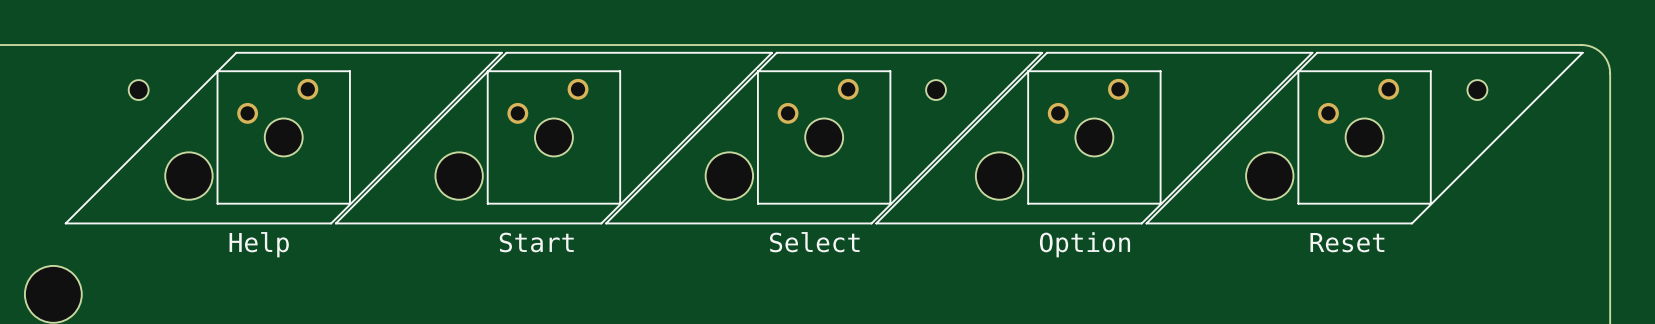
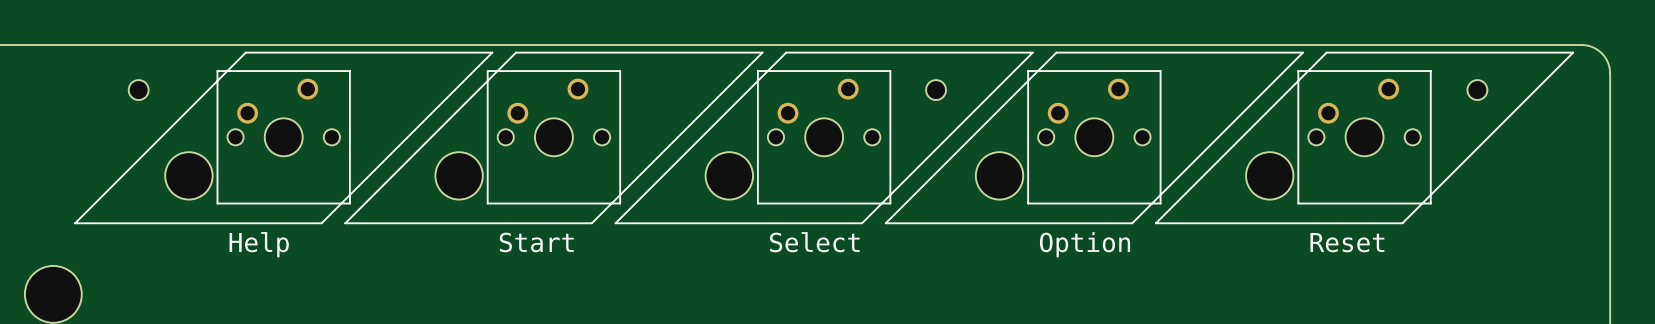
part footprint: [64, 52, 503, 225] -> [74, 51, 494, 224]
part footprint: [335, 52, 773, 225] -> [344, 51, 764, 224]
part footprint: [605, 52, 1043, 225] -> [614, 51, 1034, 224]
part footprint: [875, 52, 1314, 225] -> [885, 51, 1304, 224]
part footprint: [1145, 52, 1584, 225] -> [1155, 51, 1574, 224]

